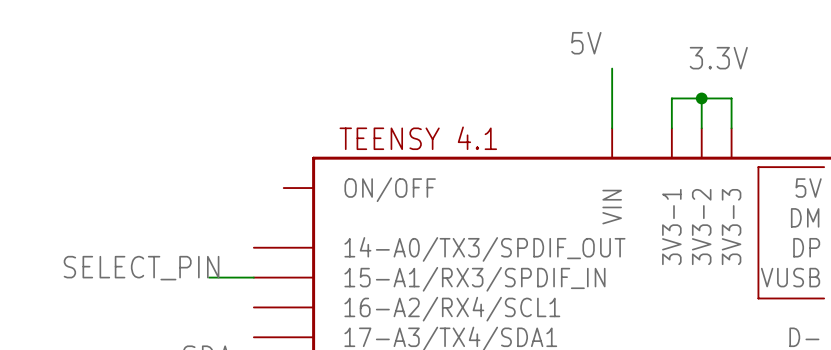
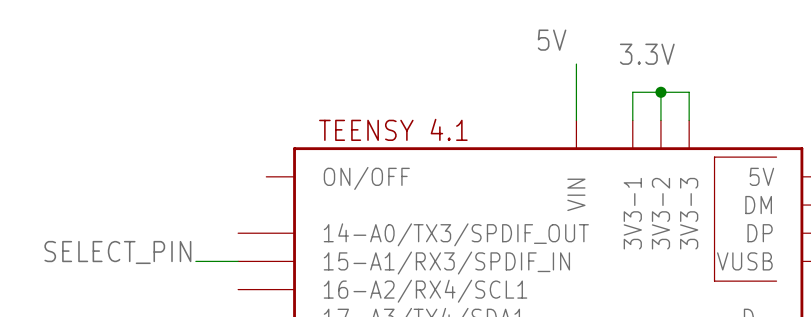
label position: 3.3V (718, 58) -> 3.3V (647, 54)
label position: SELECT_PIN (141, 268) -> SELECT_PIN (117, 252)

